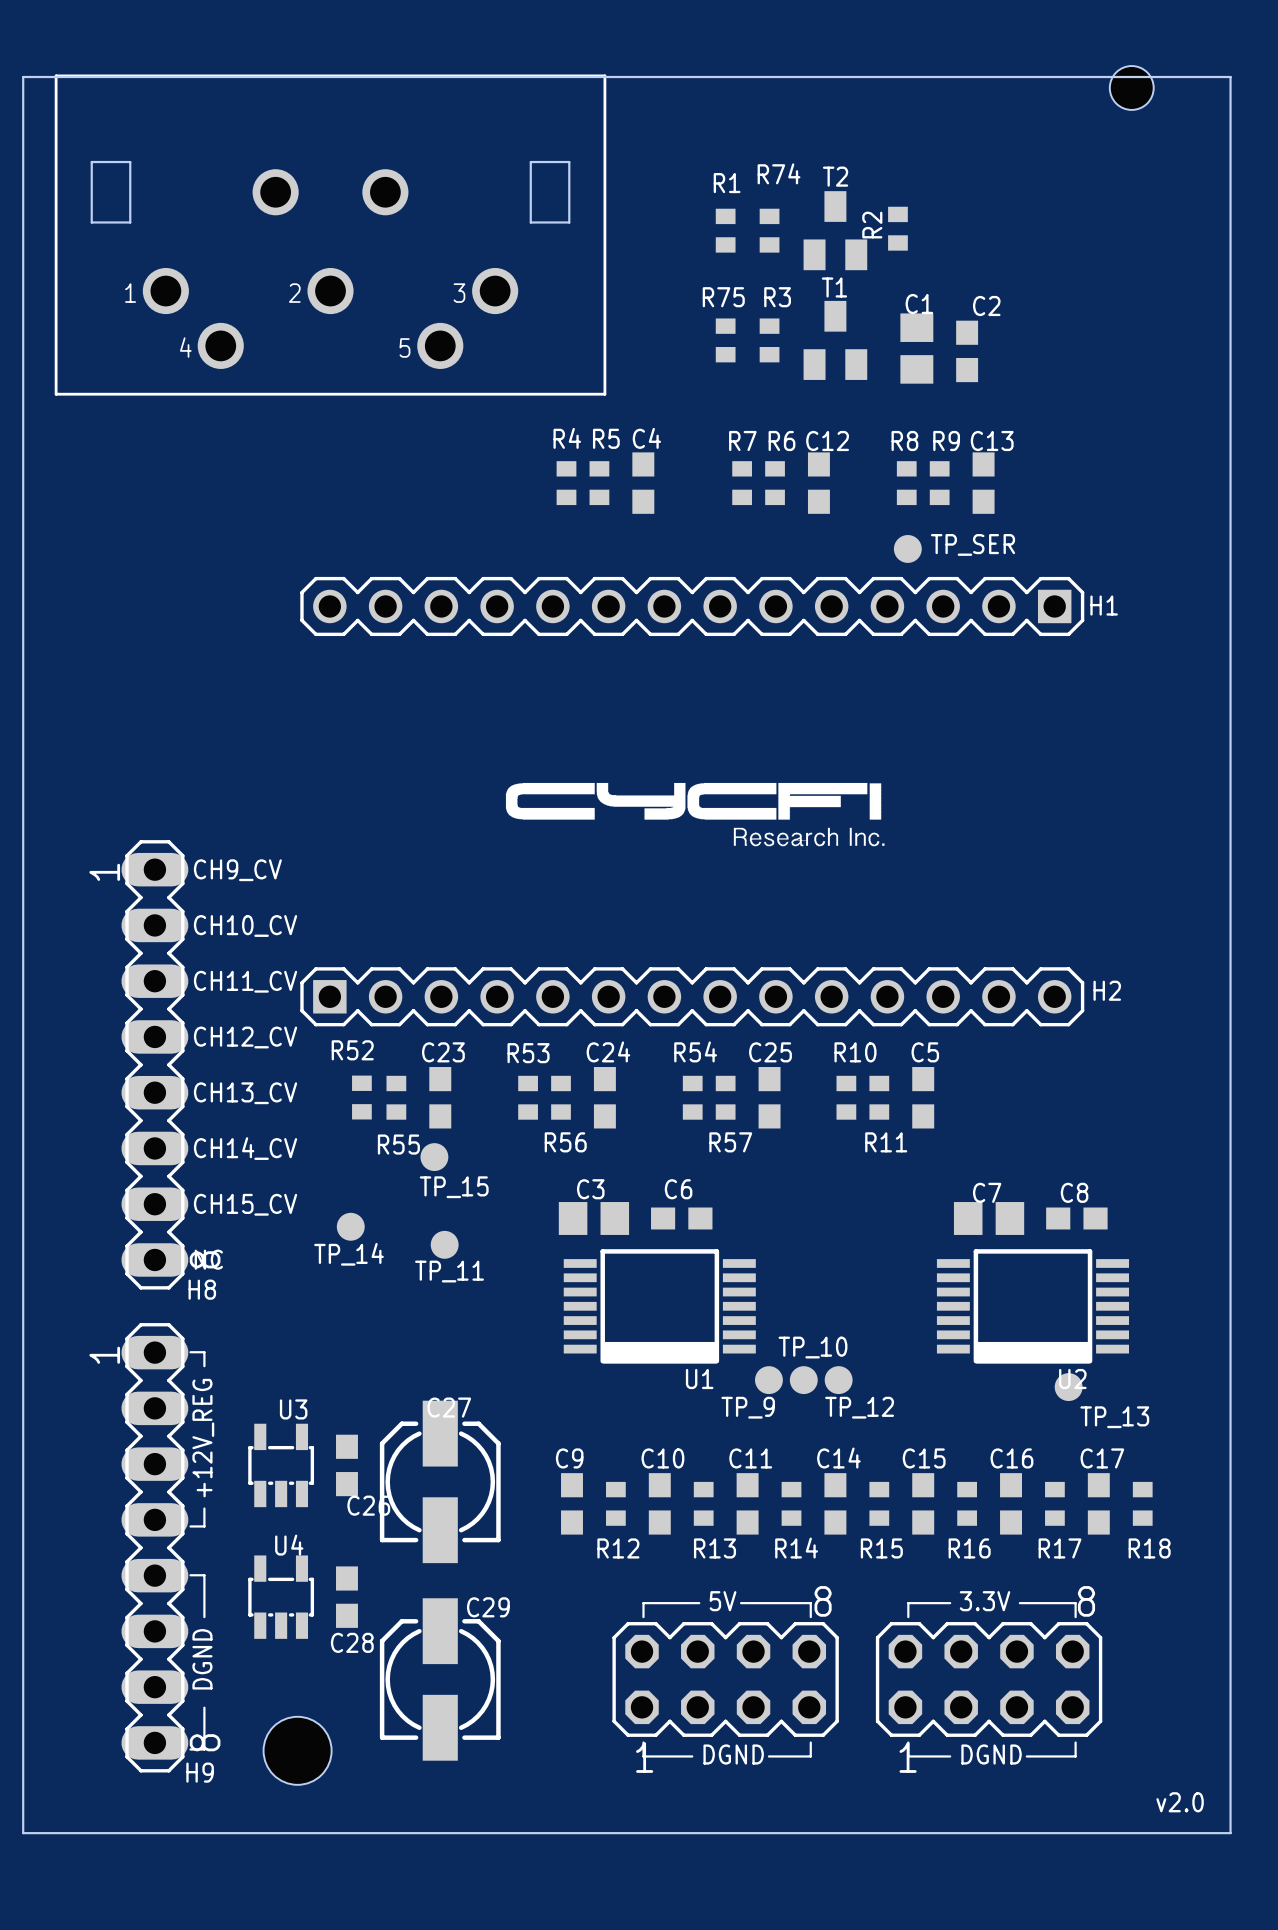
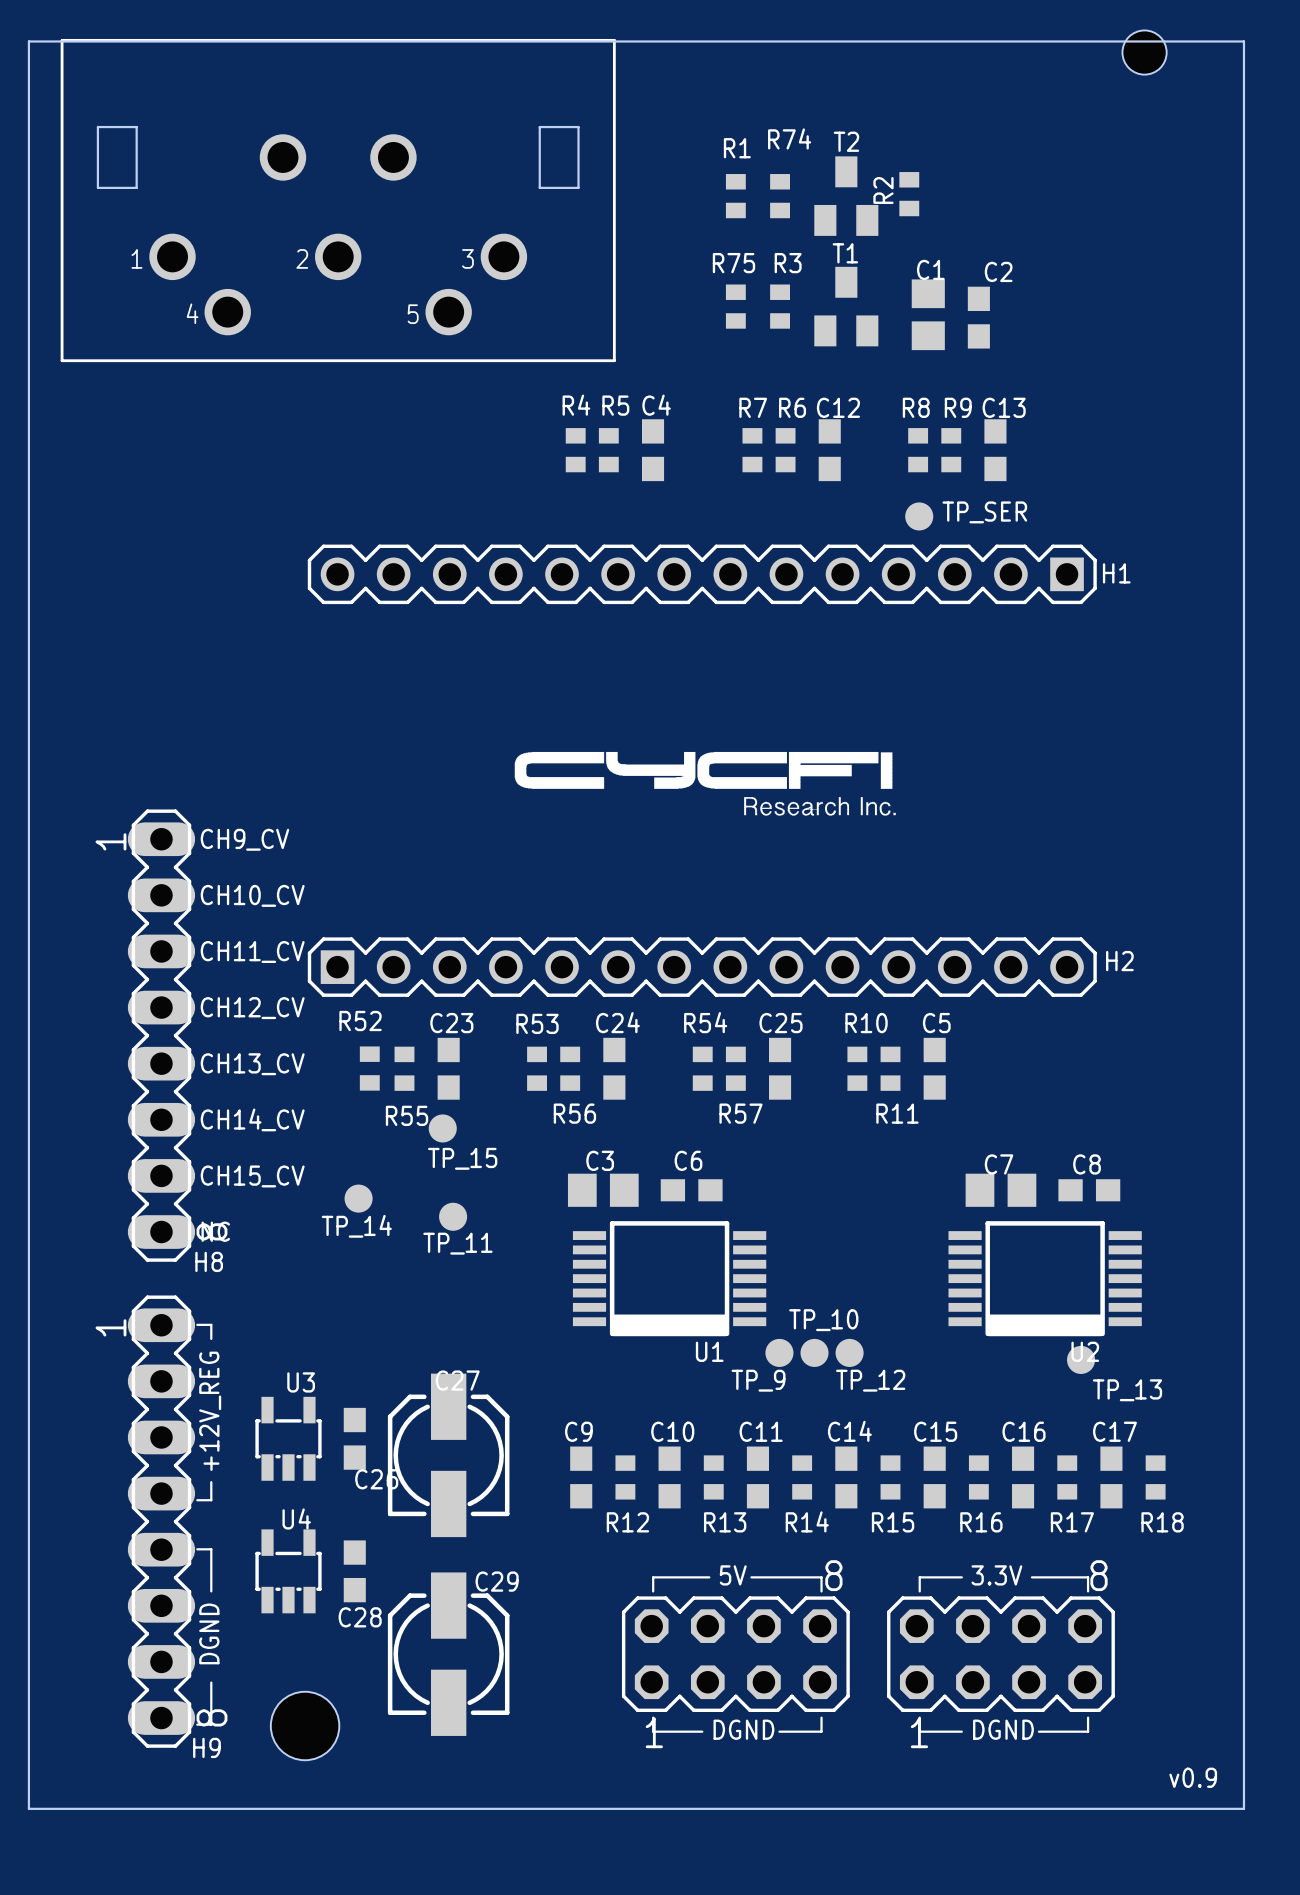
text: v2.0 (1180, 1802) -> v0.9 (1193, 1777)

